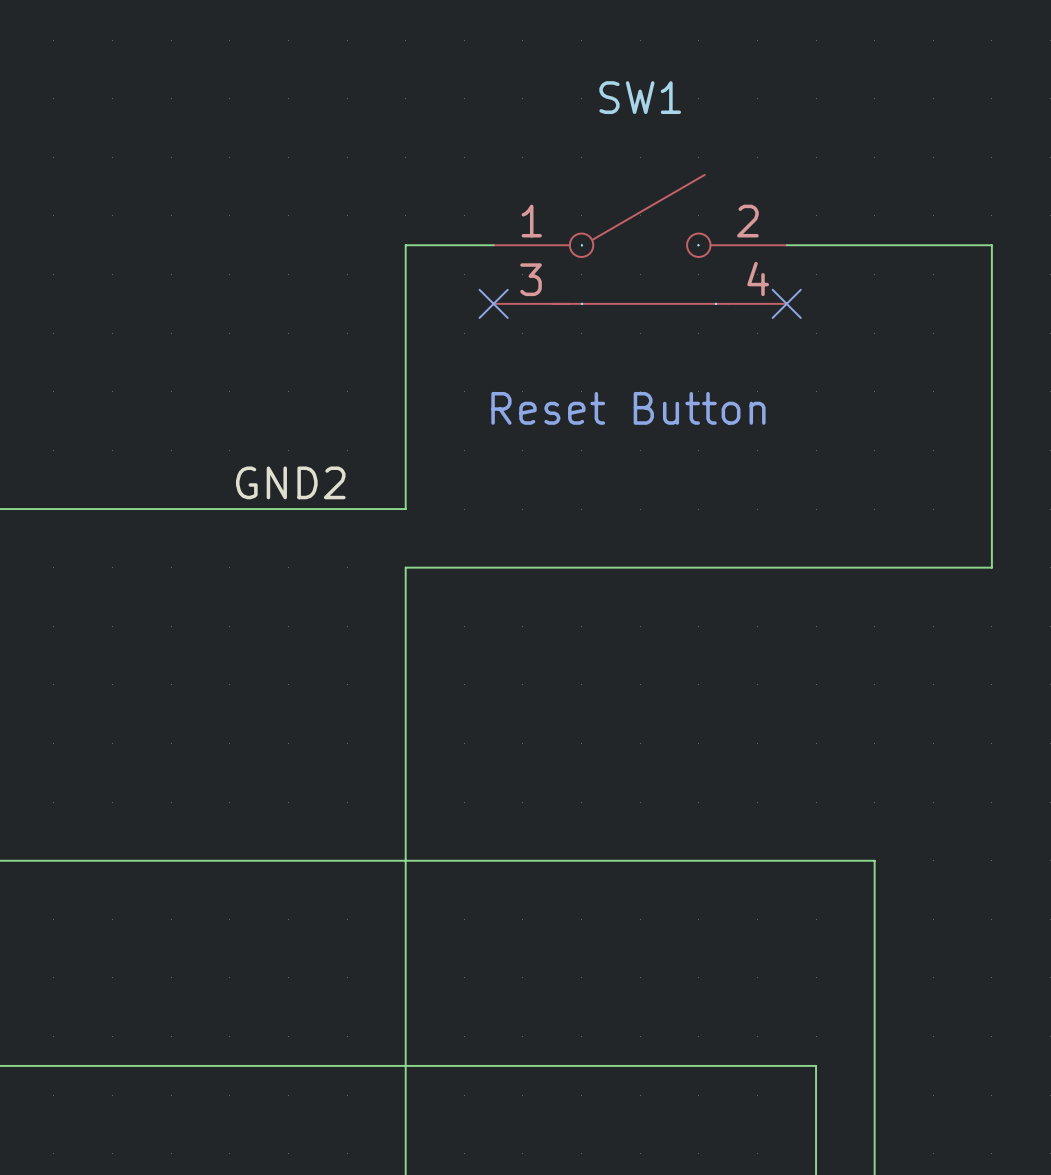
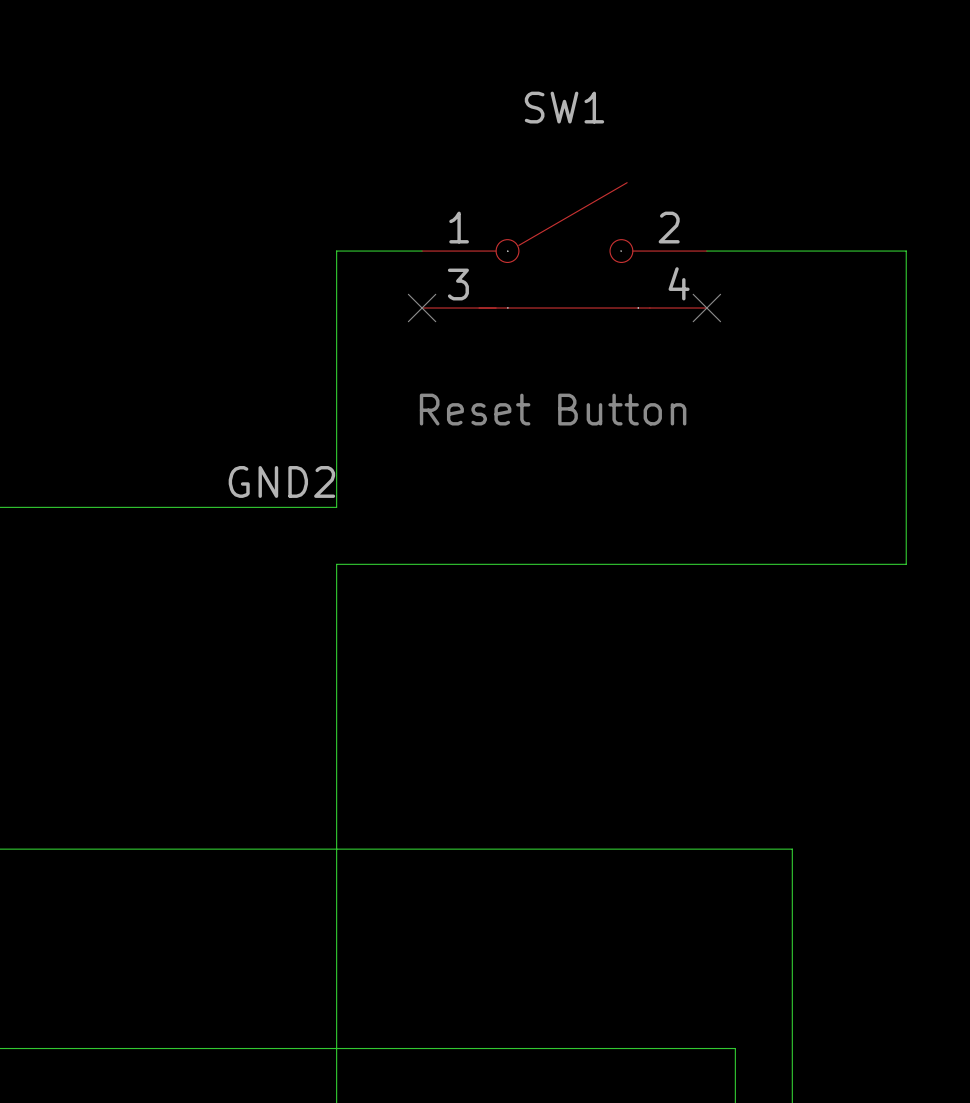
label position: GND2 (290, 482) -> GND2 (281, 481)

